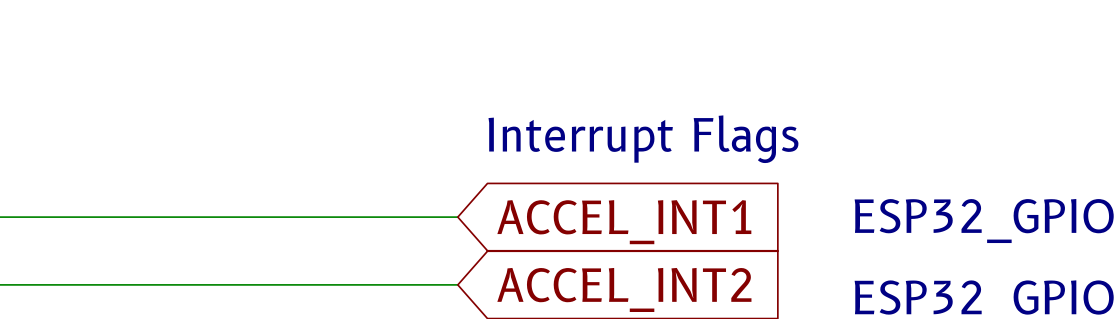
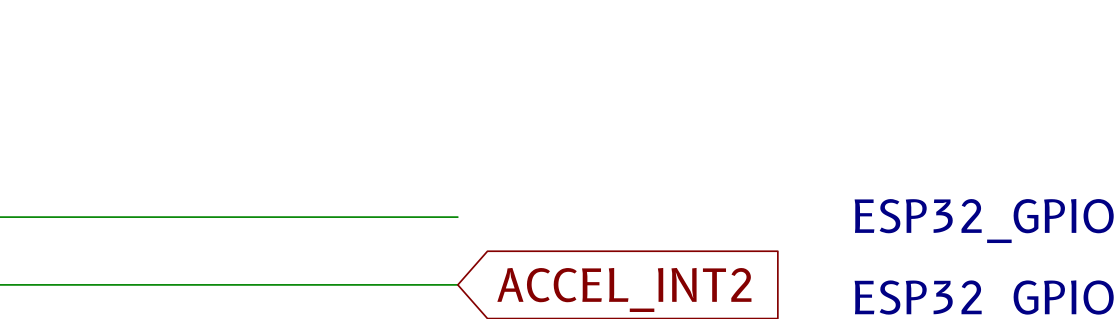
text: Interrupt Flags (643, 139) -> none
global label: ACCEL_INT1 (624, 222) -> none

